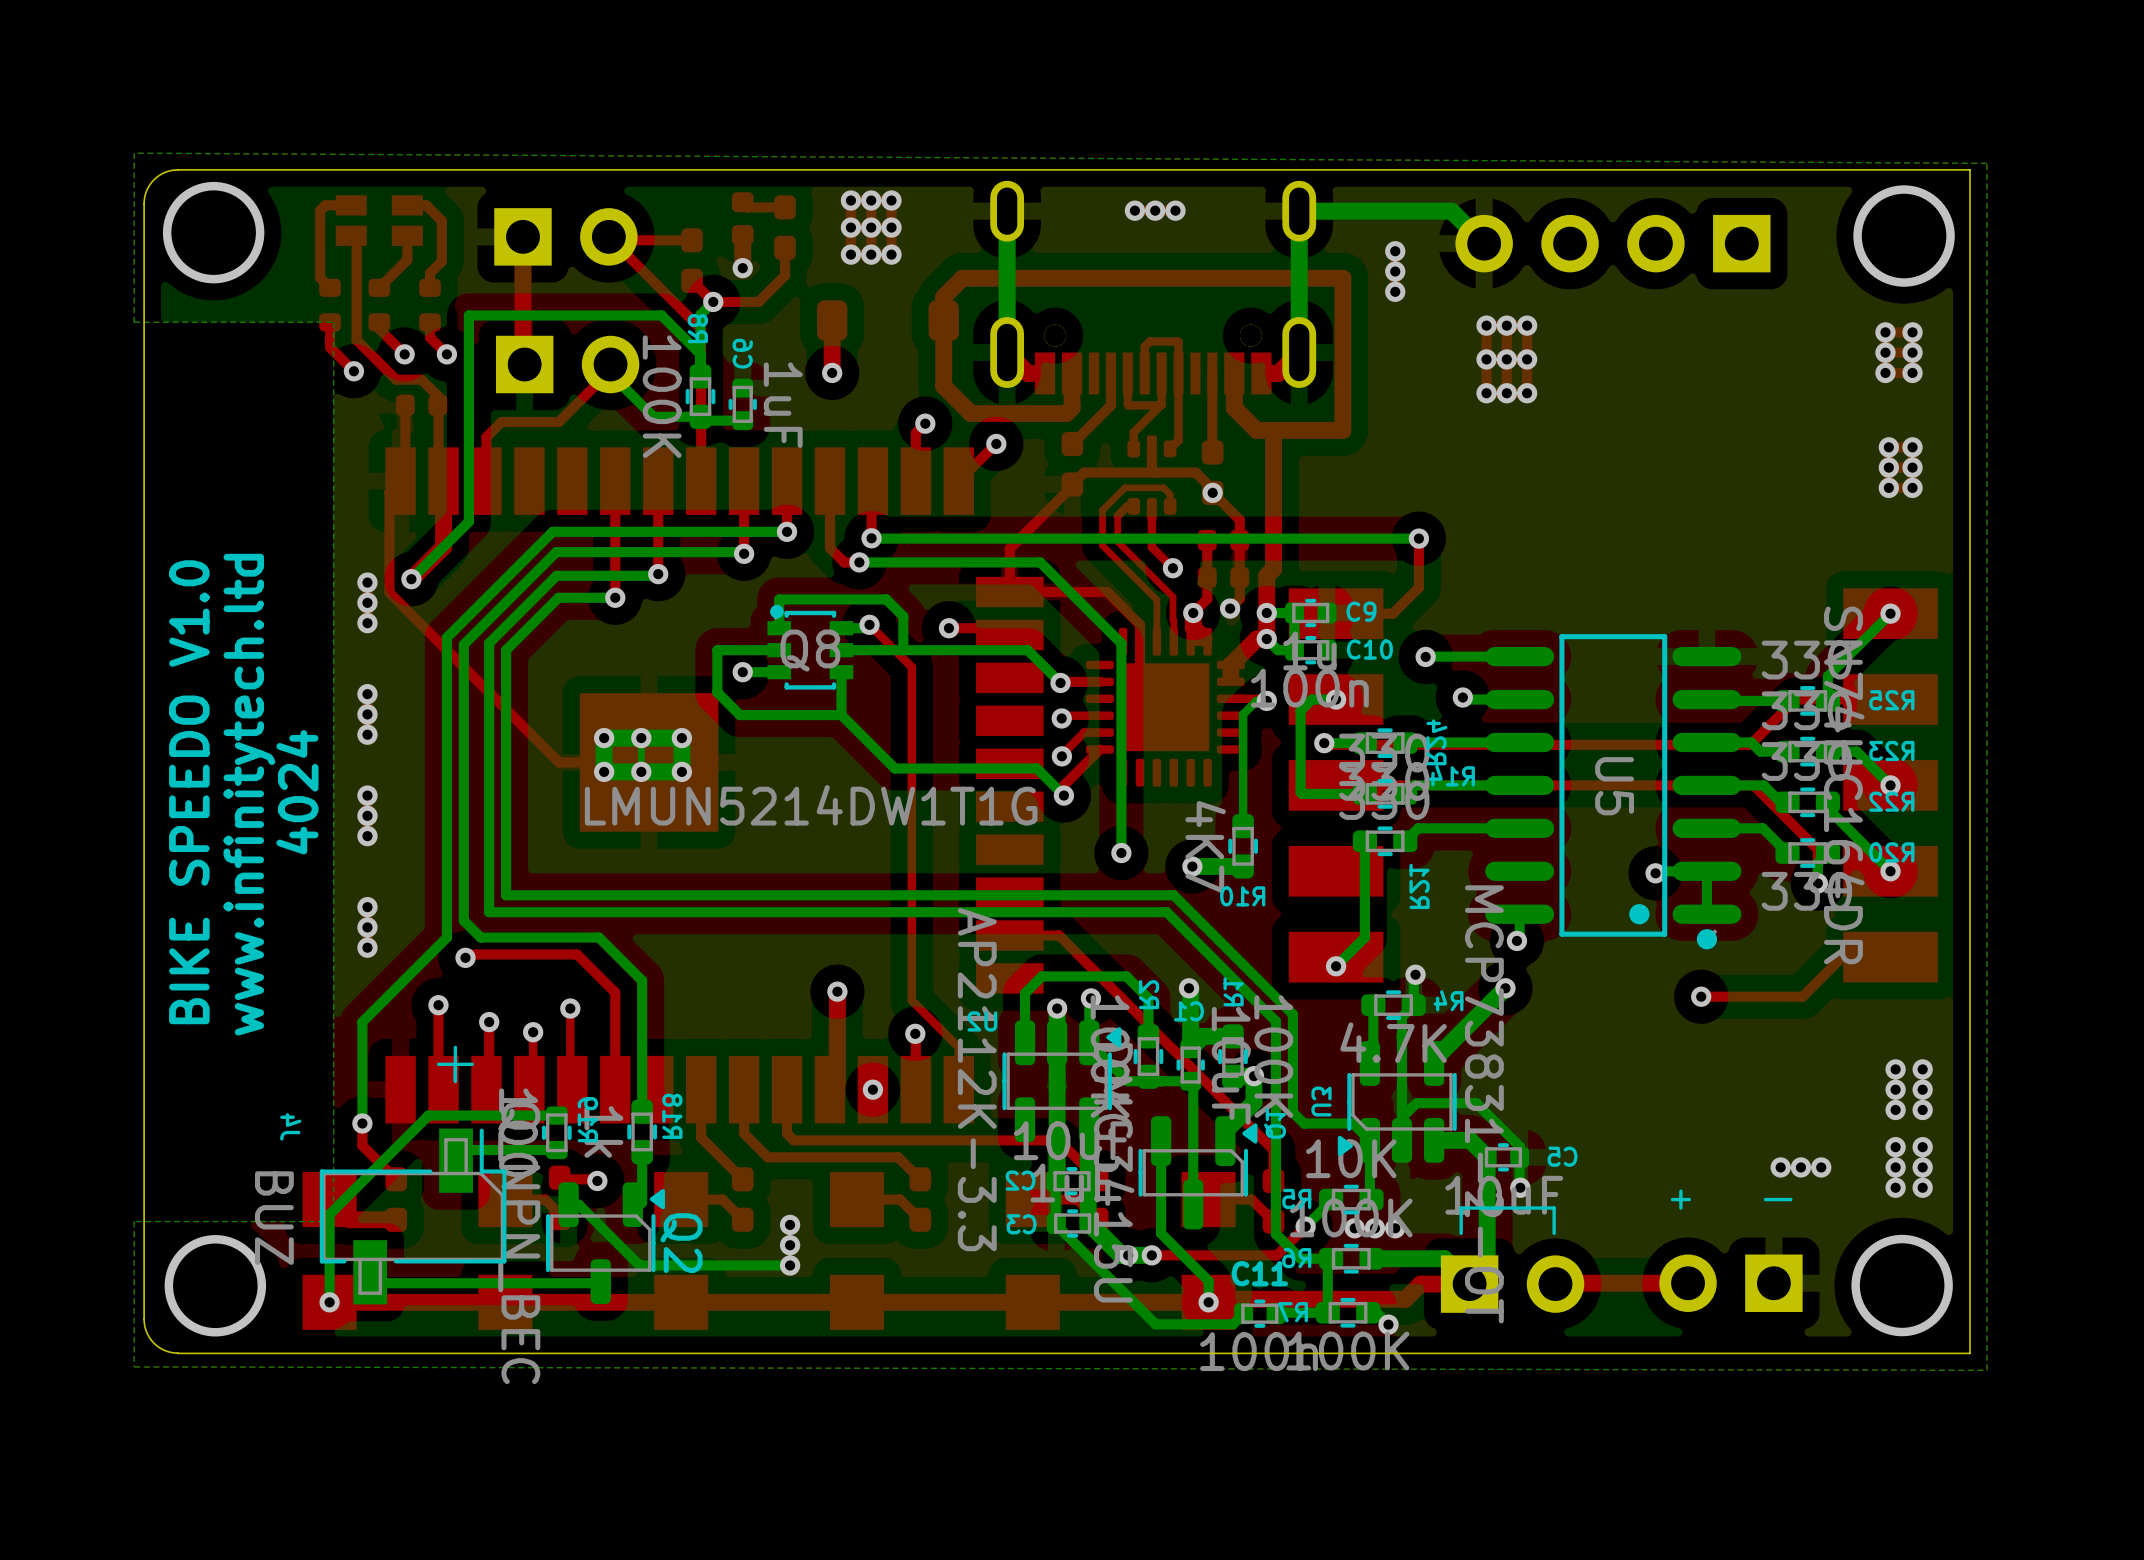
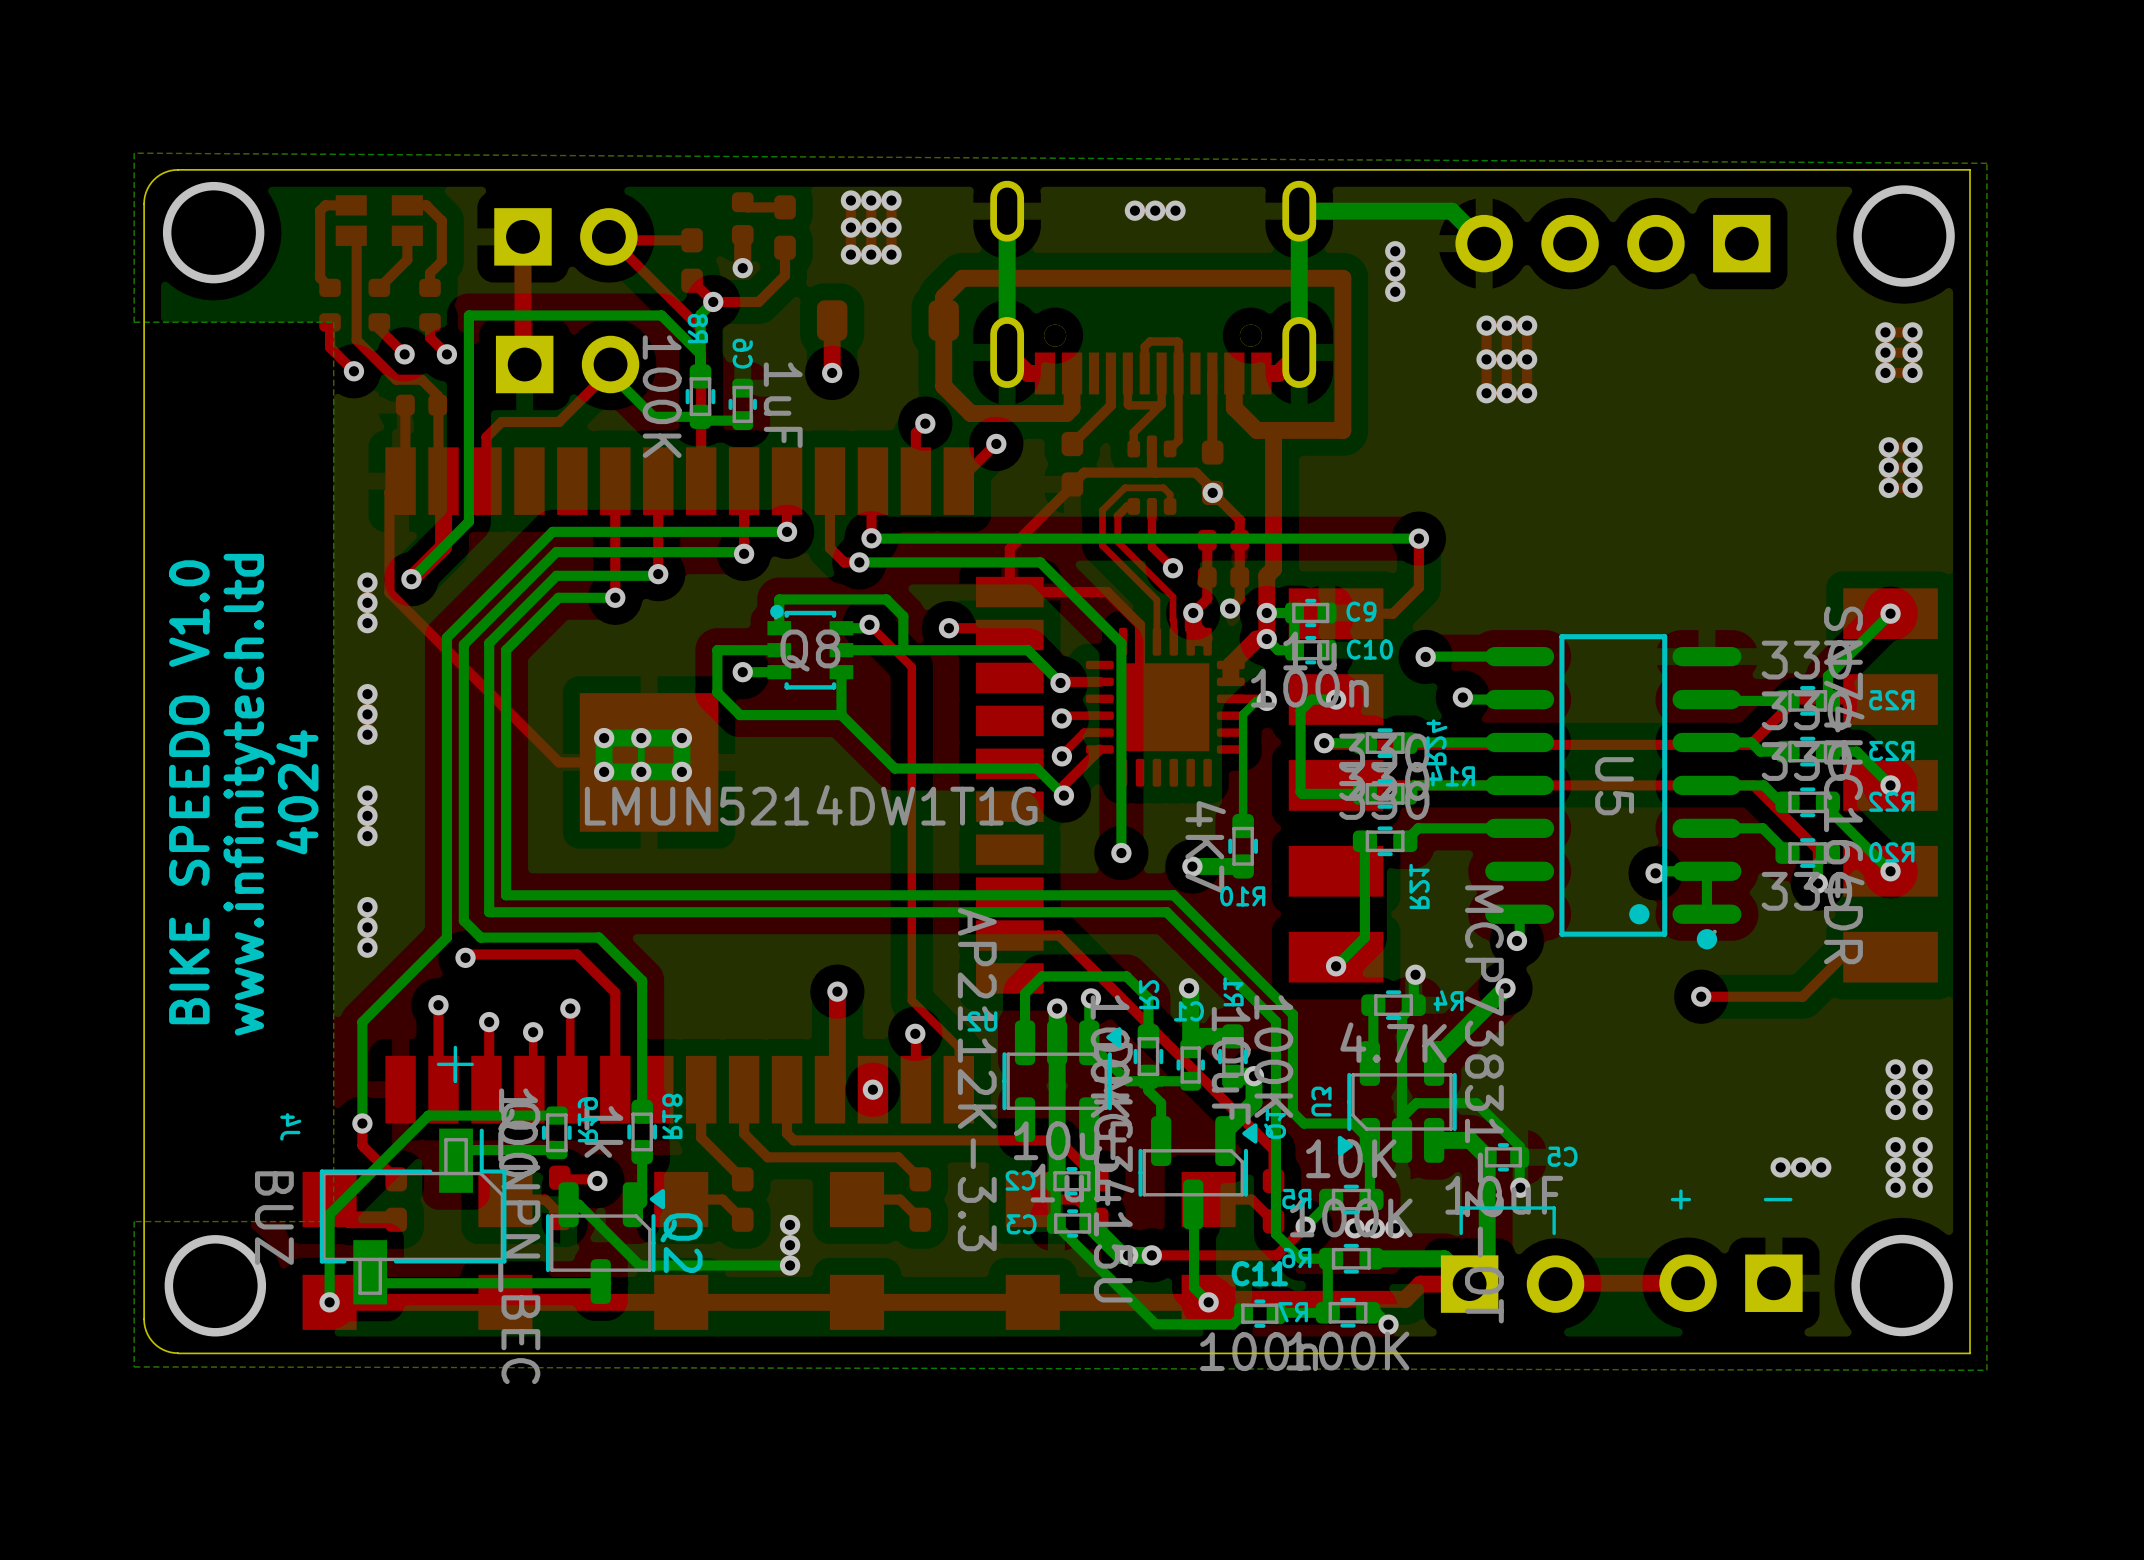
bottom track: none -> (1148, 1076) (1148, 1090) (1161, 1103) (1161, 1141)
bottom track: (1193, 1083) (1193, 1204) -> none
bottom track: (1161, 1141) (1161, 1233) (1208, 1281) (1208, 1302) -> (1193, 1204) (1194, 1287) (1208, 1302)

